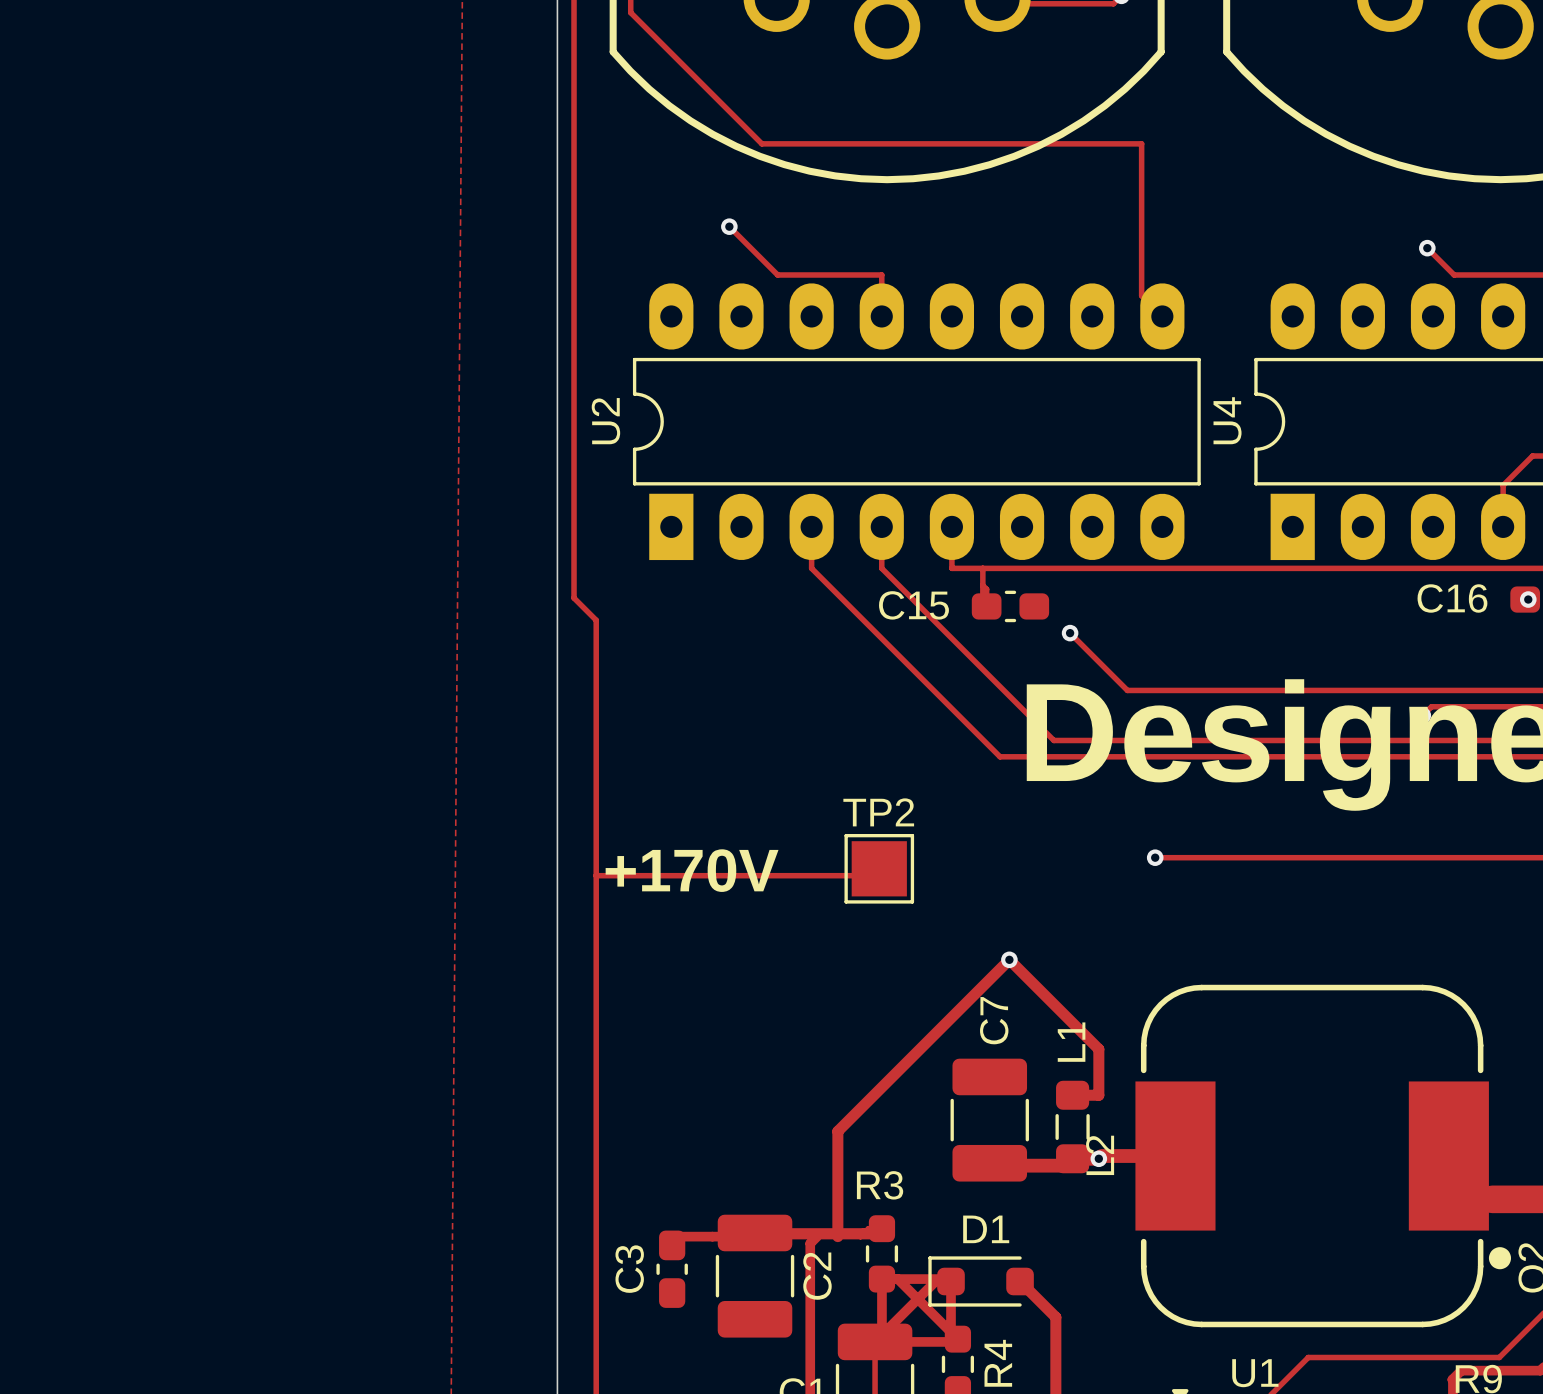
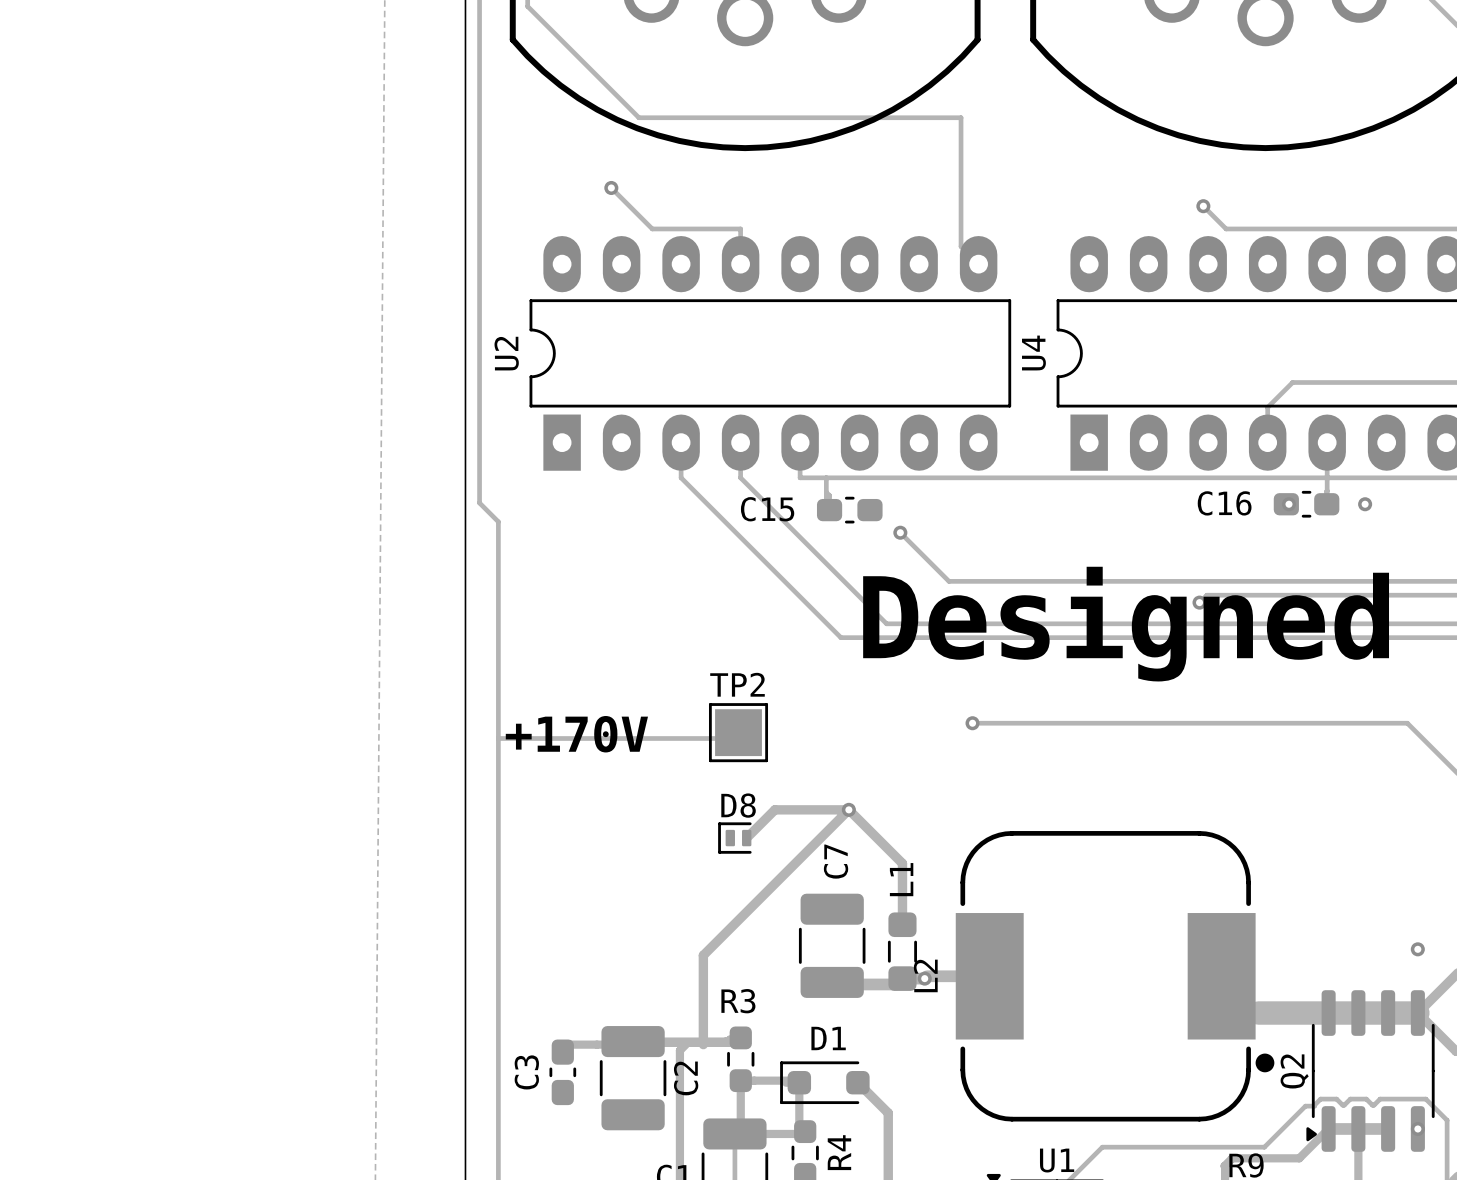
track: (1009, 959) (1098, 1049) (1098, 1095) (1072, 1095) -> (746, 838) (774, 809) (848, 809) (902, 863) (902, 924)
D8: none -> (734, 838)
track: (897, 1279) (917, 1299) -> none
track: (935, 1281) (917, 1299) -> none
track: (917, 1299) (957, 1339) -> none
track: (917, 1299) (875, 1341) -> none

